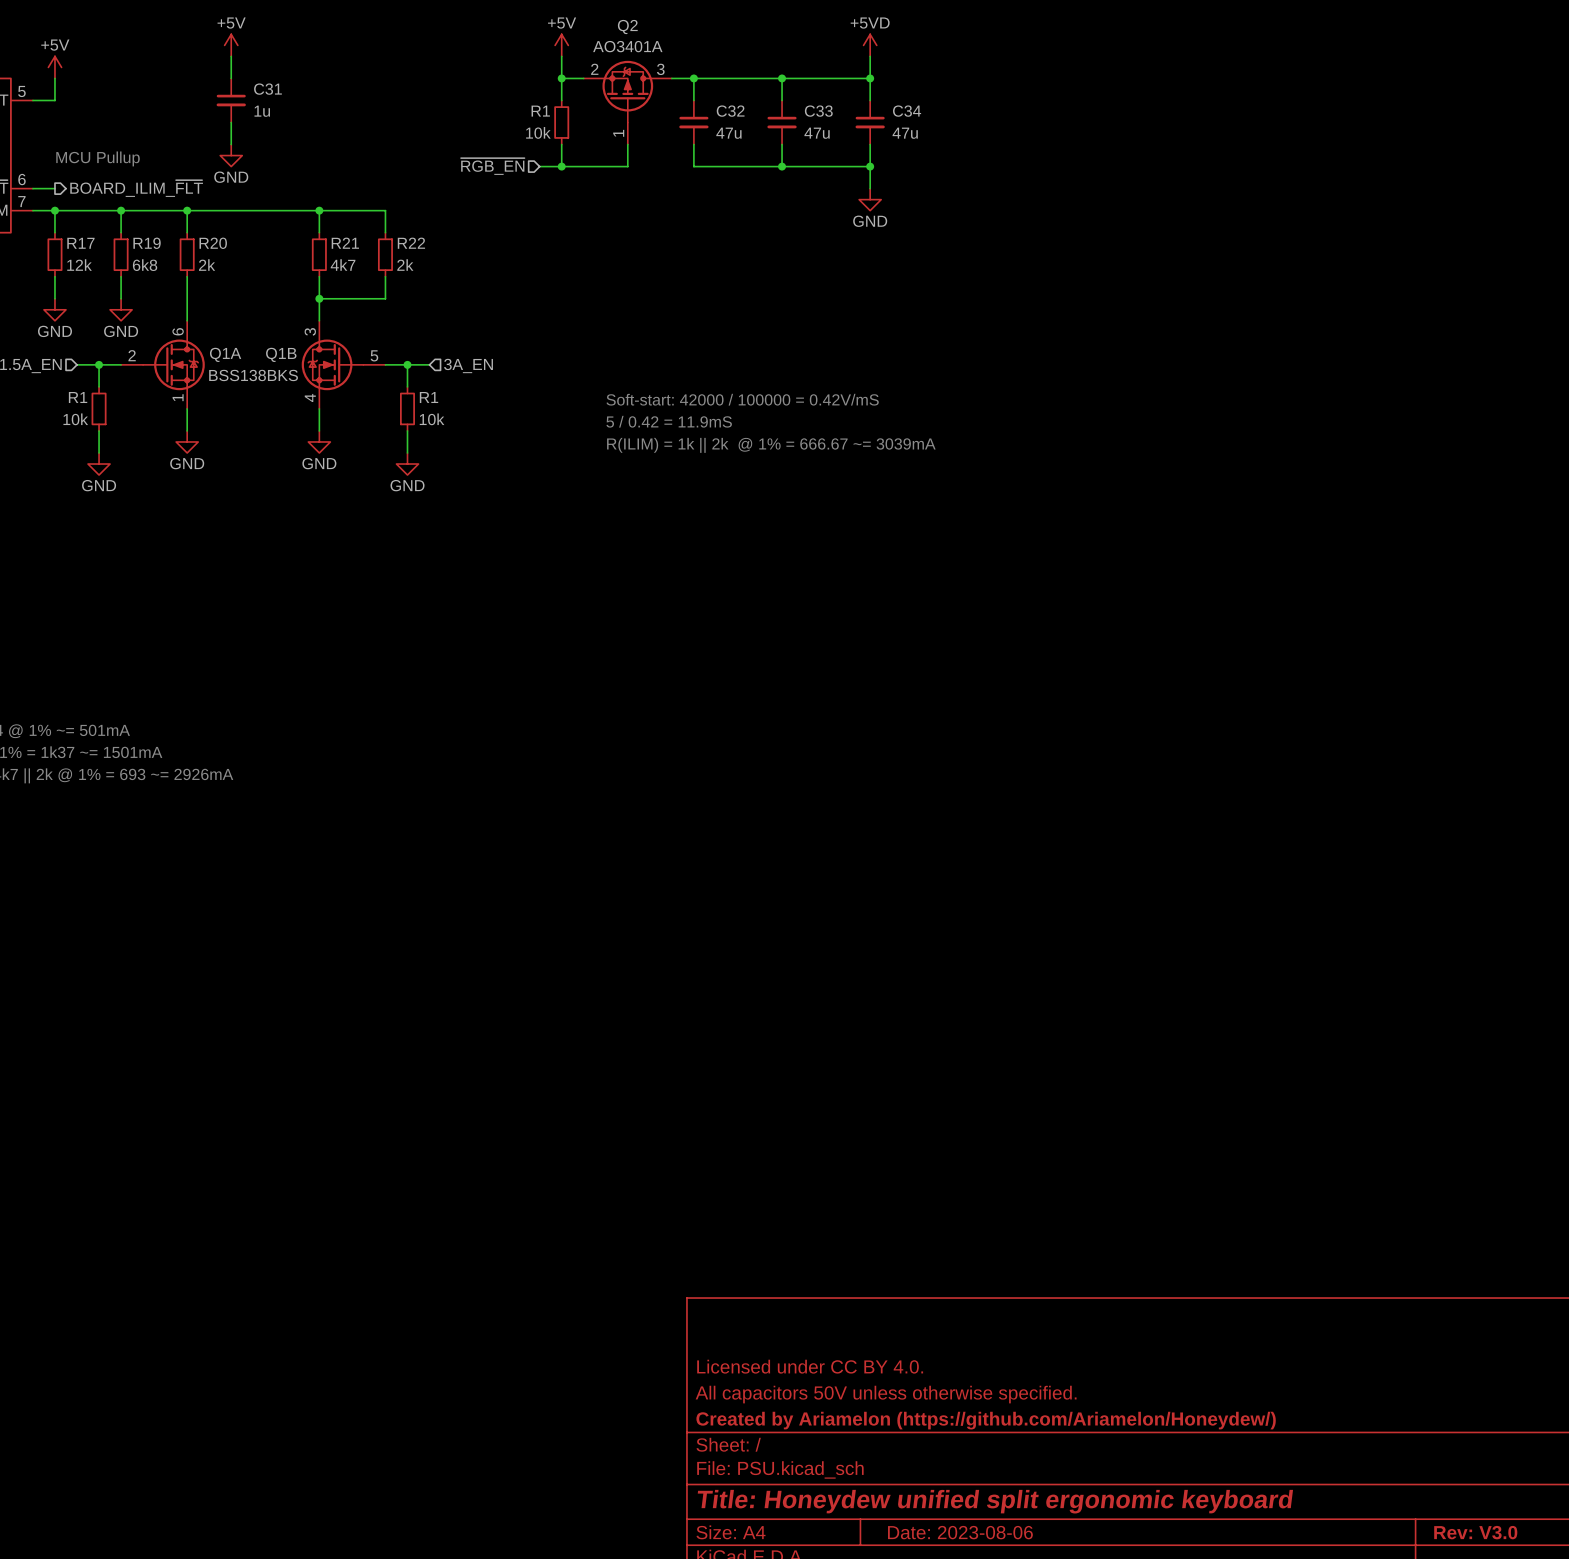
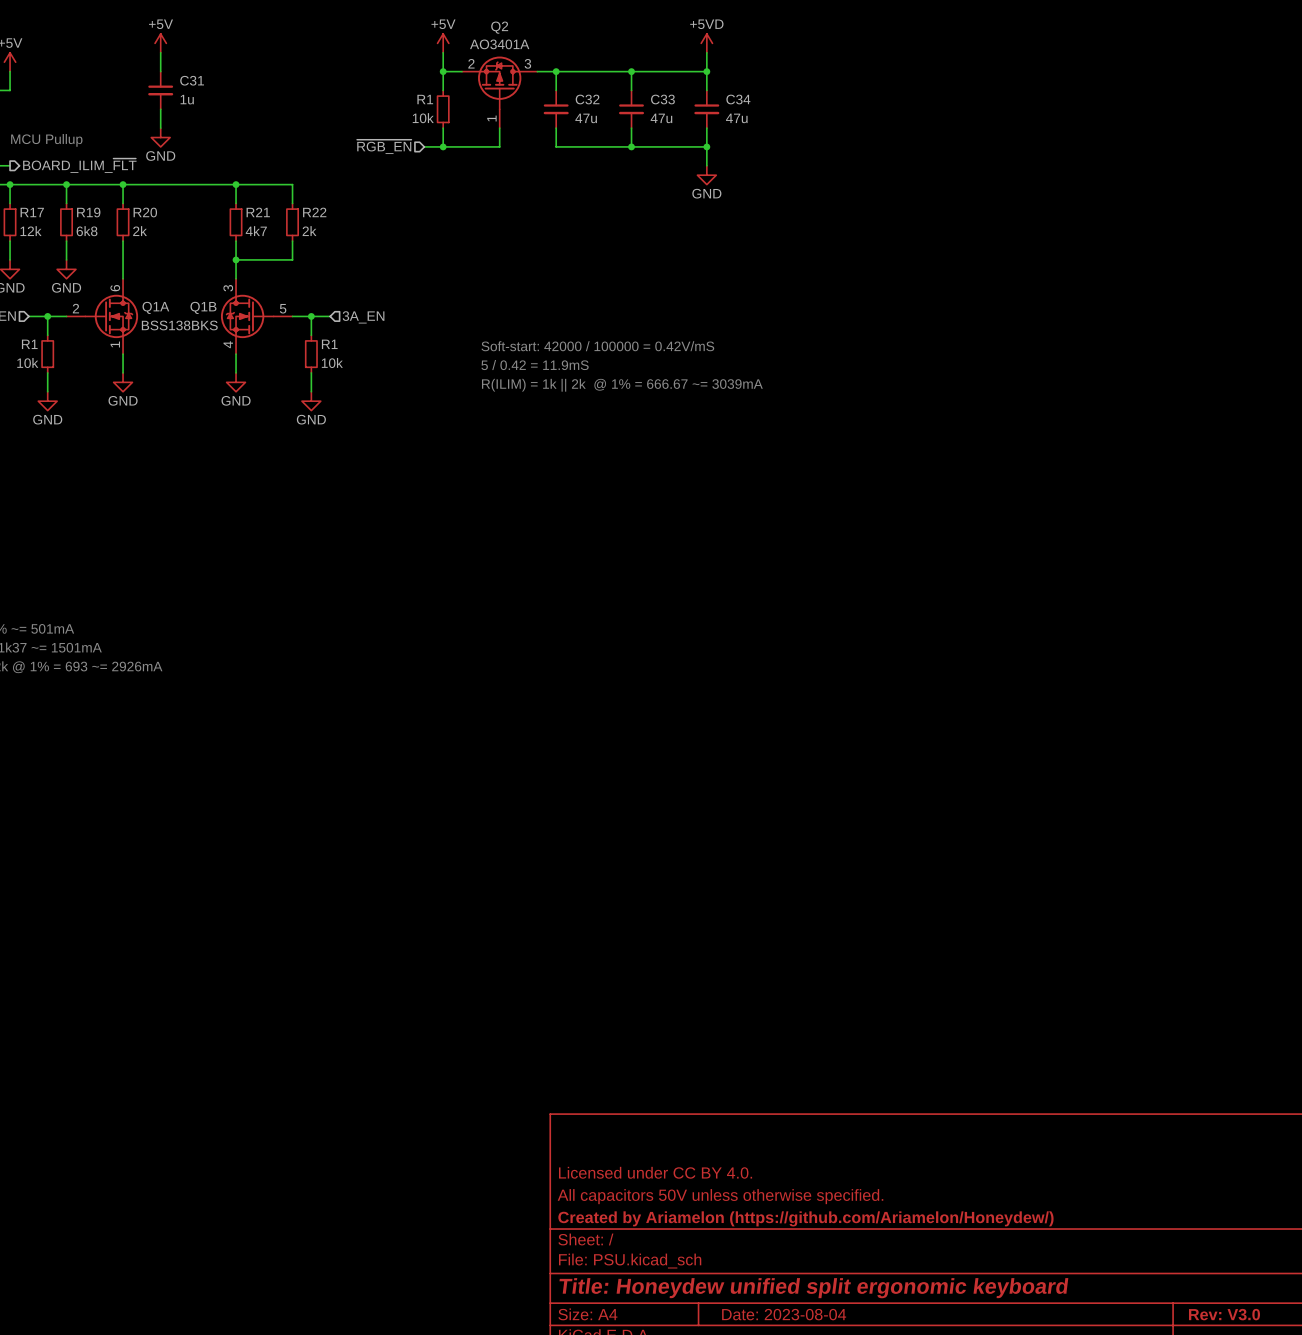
title block: Date: 2023-08-06 (960, 1532) -> Date: 2023-08-04 (784, 1314)

